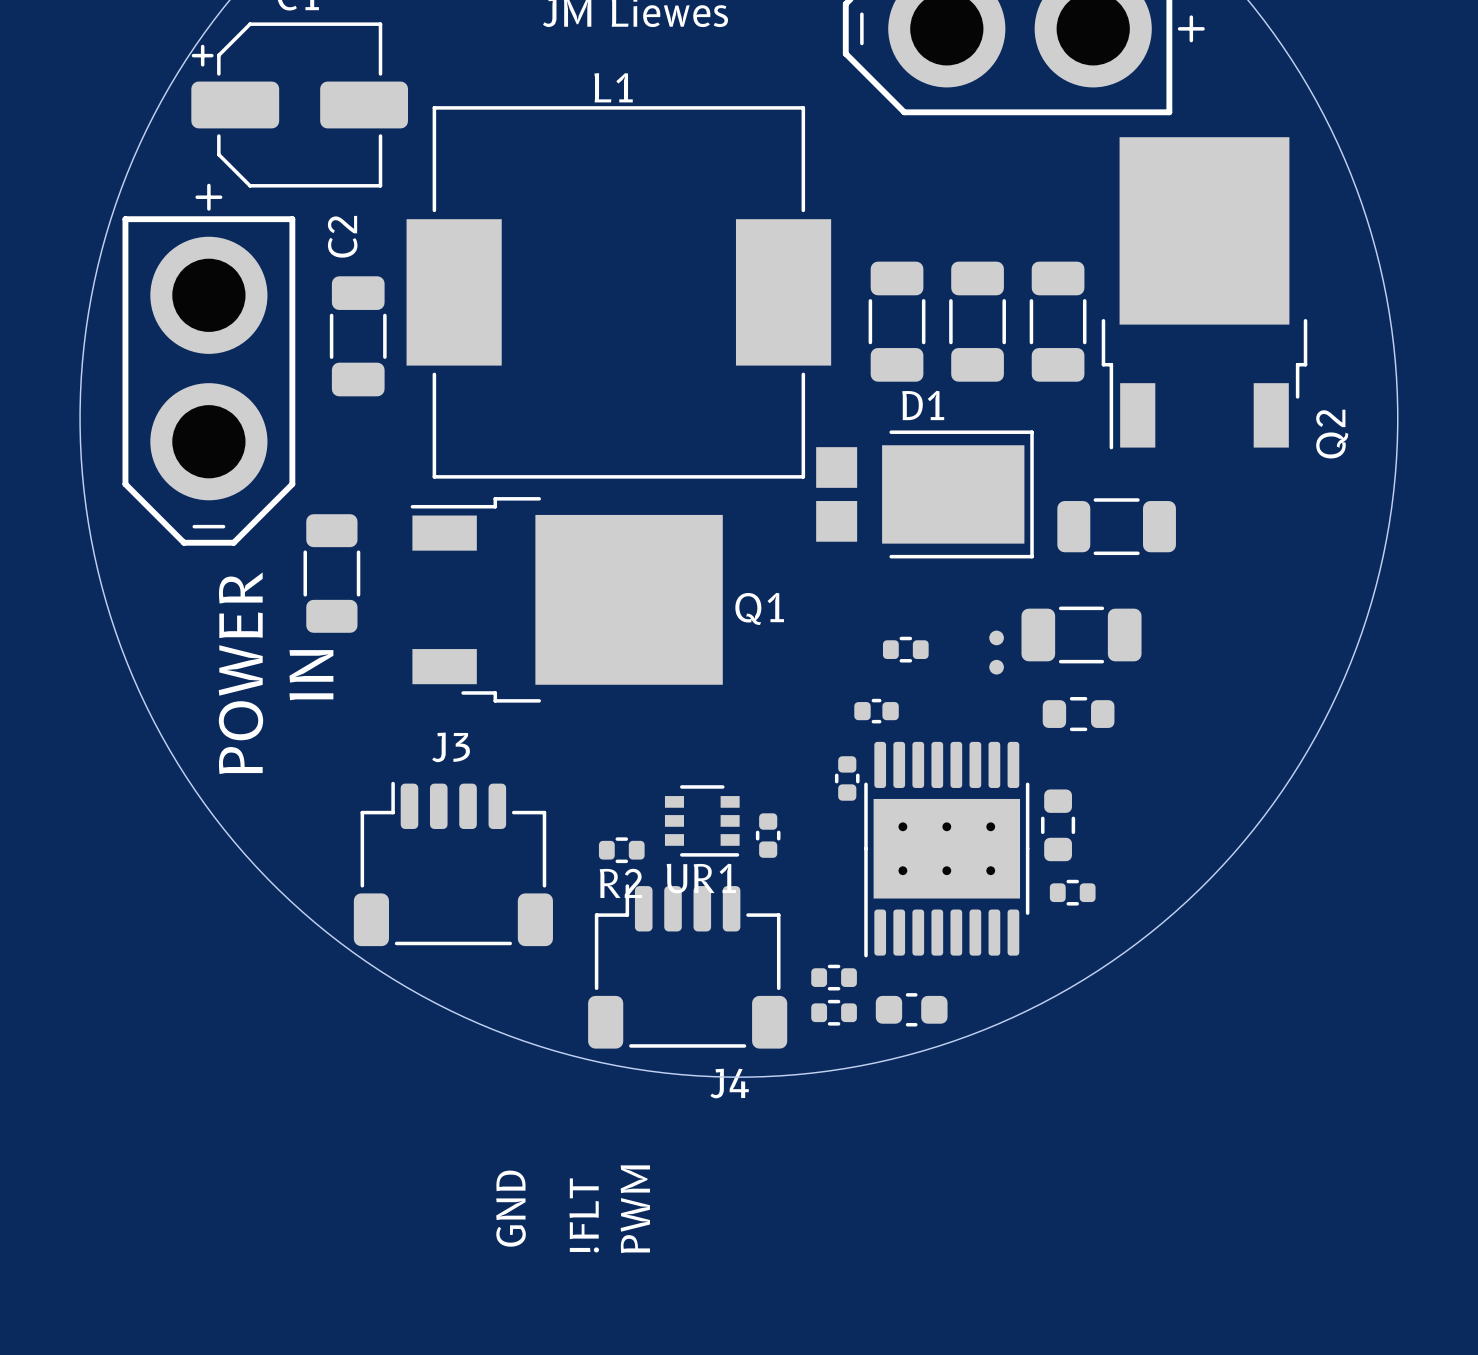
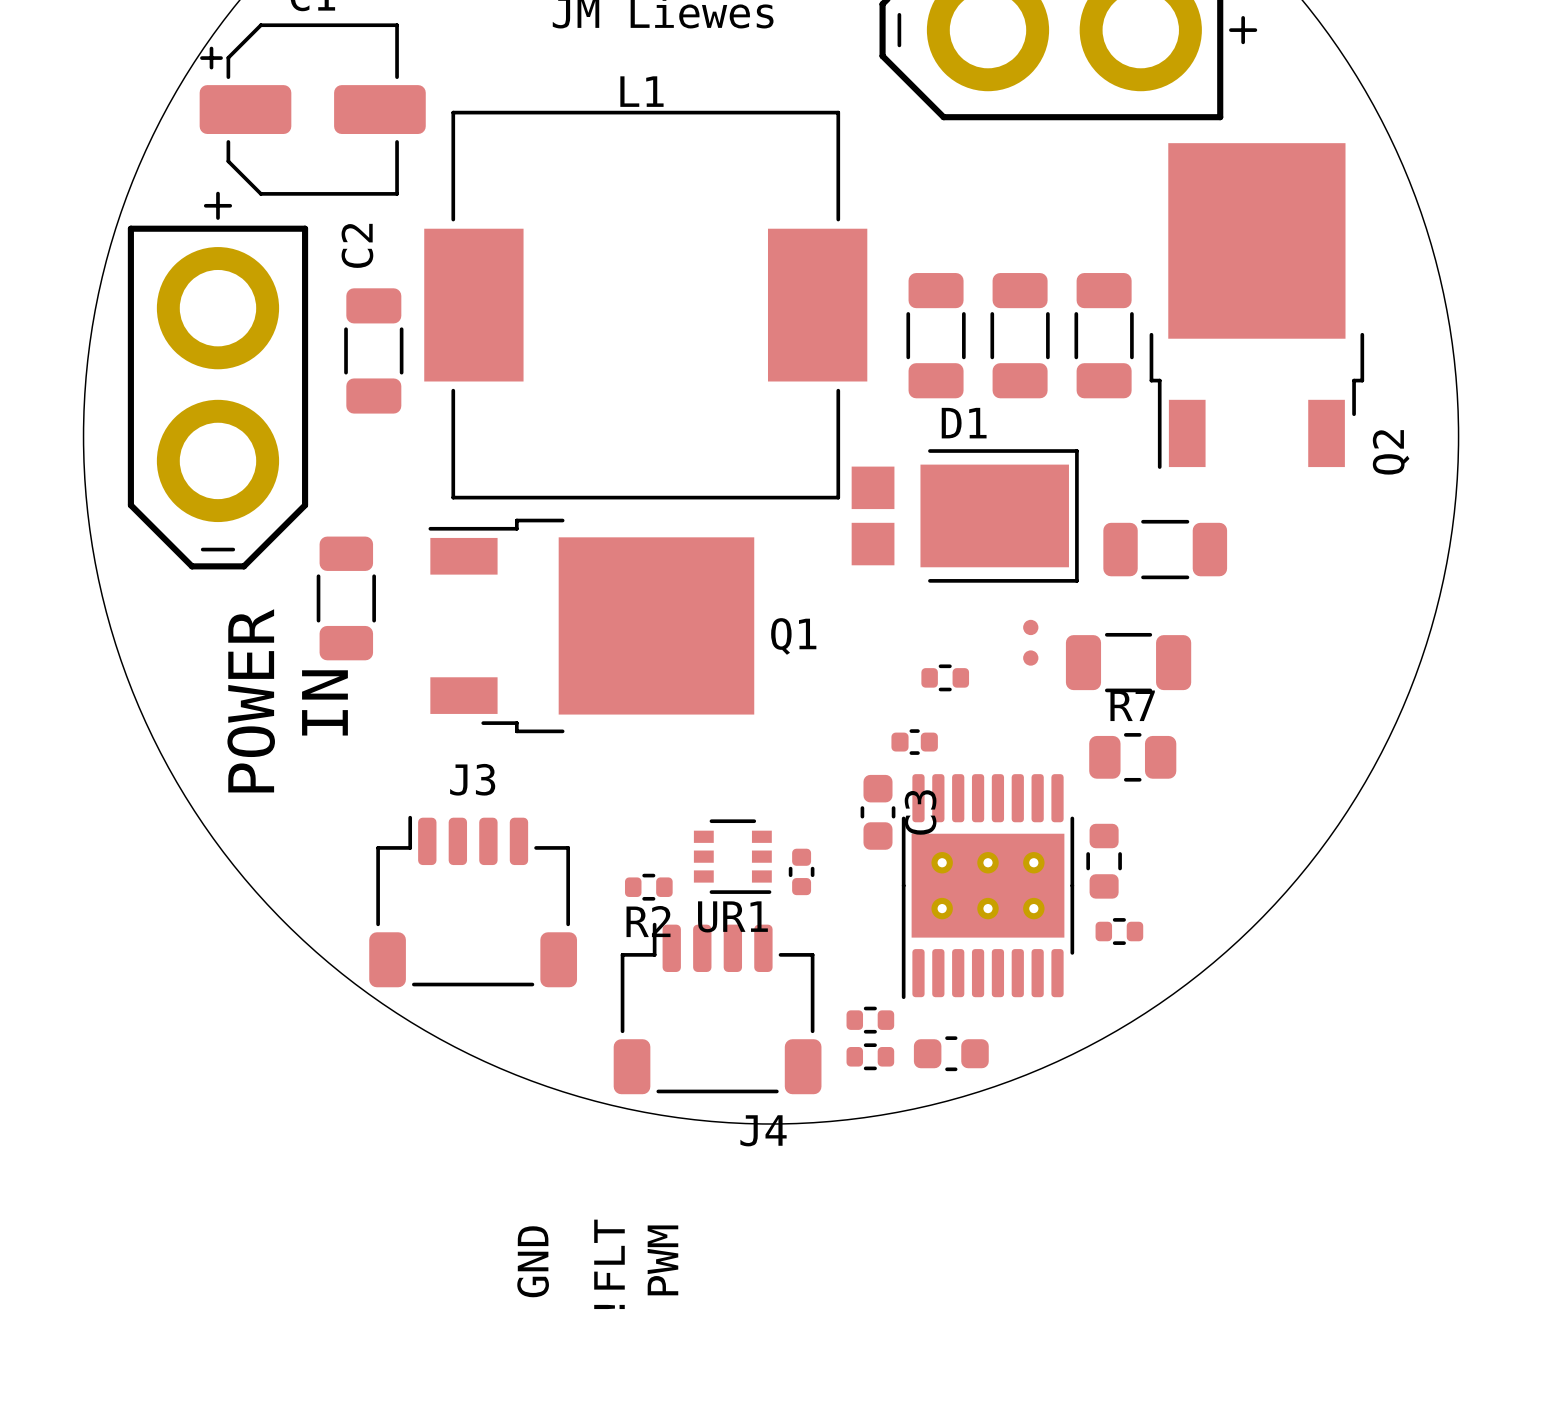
part position: (996, 652) -> (1030, 642)
part: (1078, 714) -> none
R7: none -> (1132, 757)
C3: none -> (877, 812)
part: (847, 778) -> none

